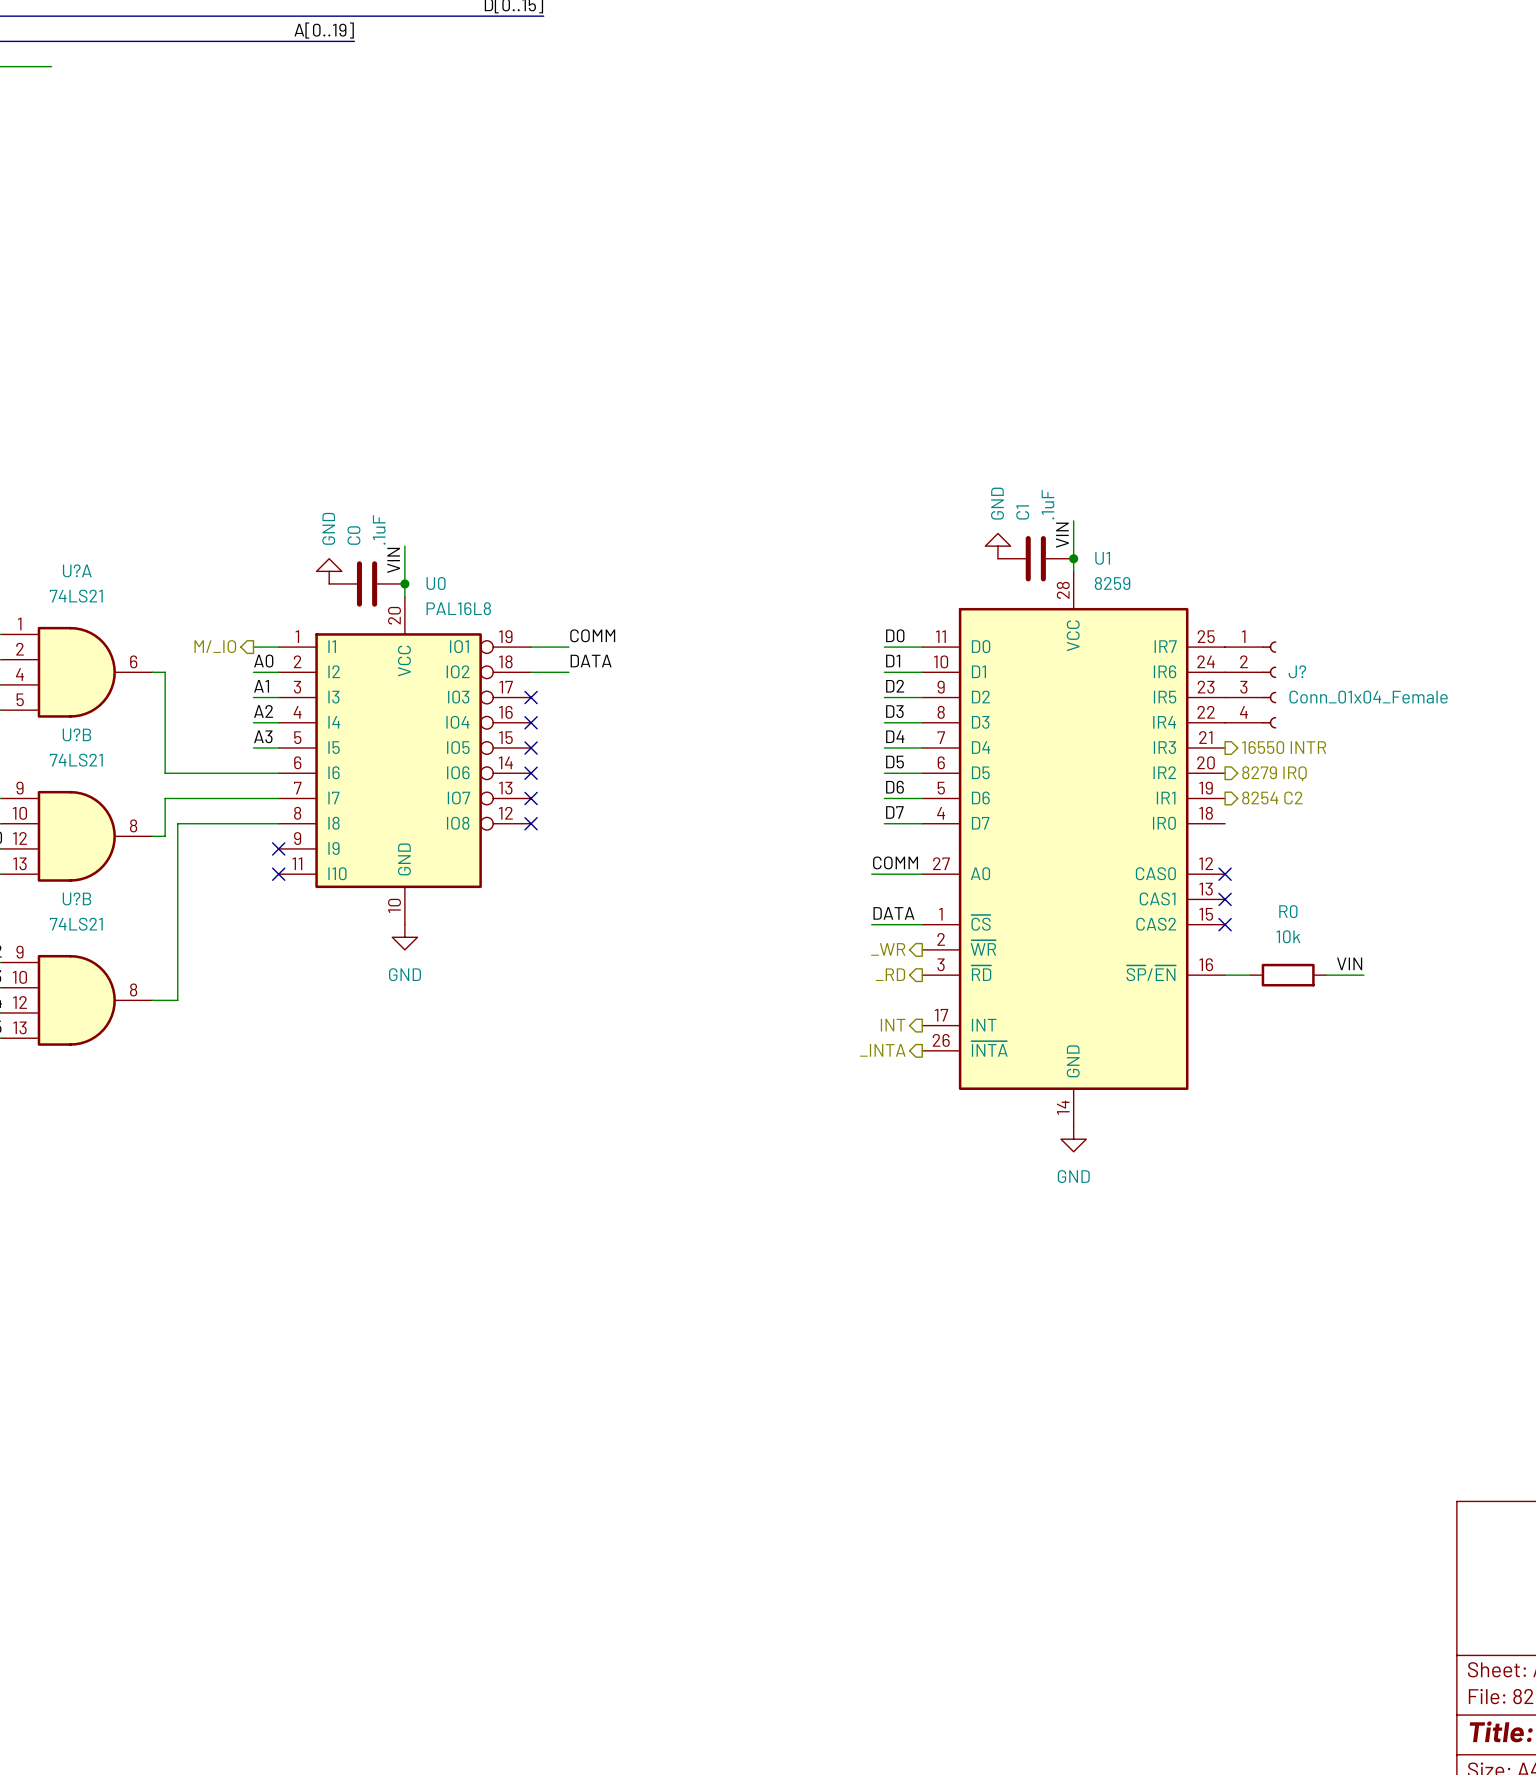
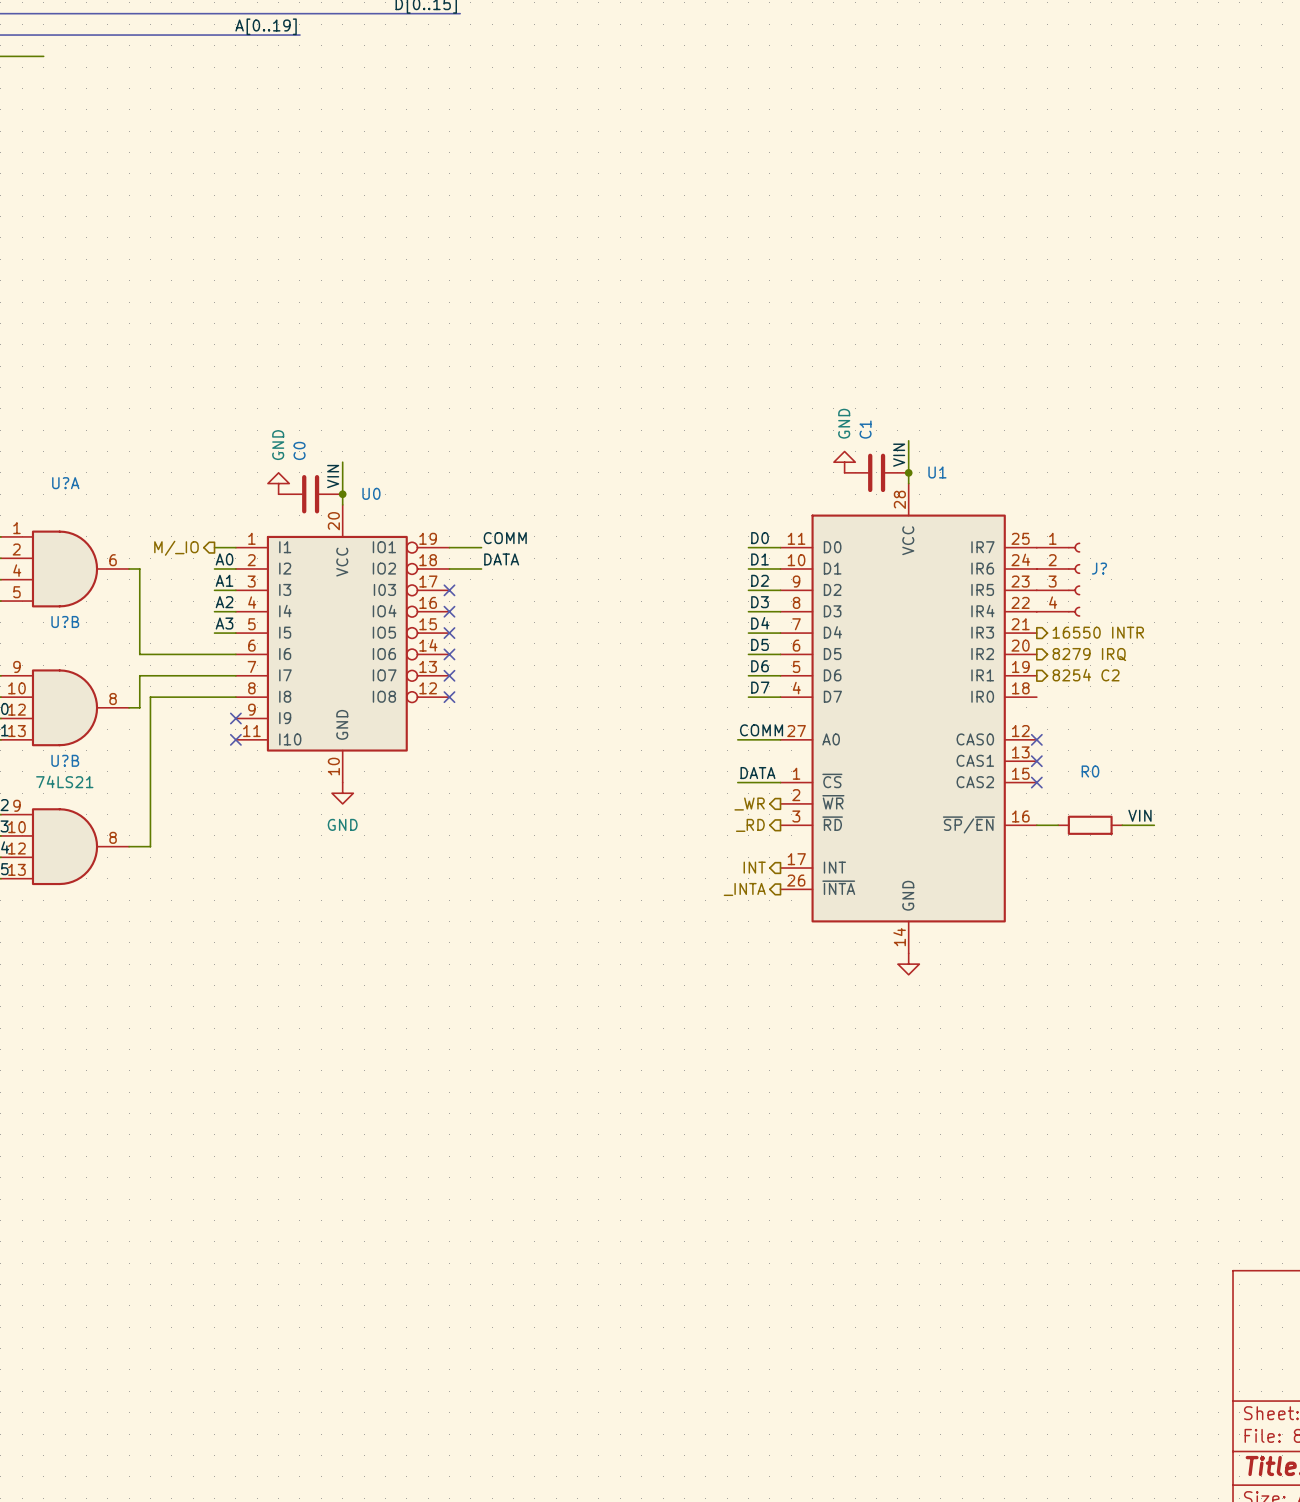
C1 value: .1uF (1048, 504) -> none
C0 value: .1uF (379, 529) -> none
U1 value: 8259 (1112, 583) -> none
U?A value: 74LS21 (76, 596) -> none
U0 value: PAL16L8 (458, 608) -> none
J? value: Conn_01x04_Female (1368, 697) -> none
U?B value: 74LS21 (76, 760) -> none
R0 value: 10k (1288, 936) -> none
power symbol text: GND (1073, 1176) -> none

